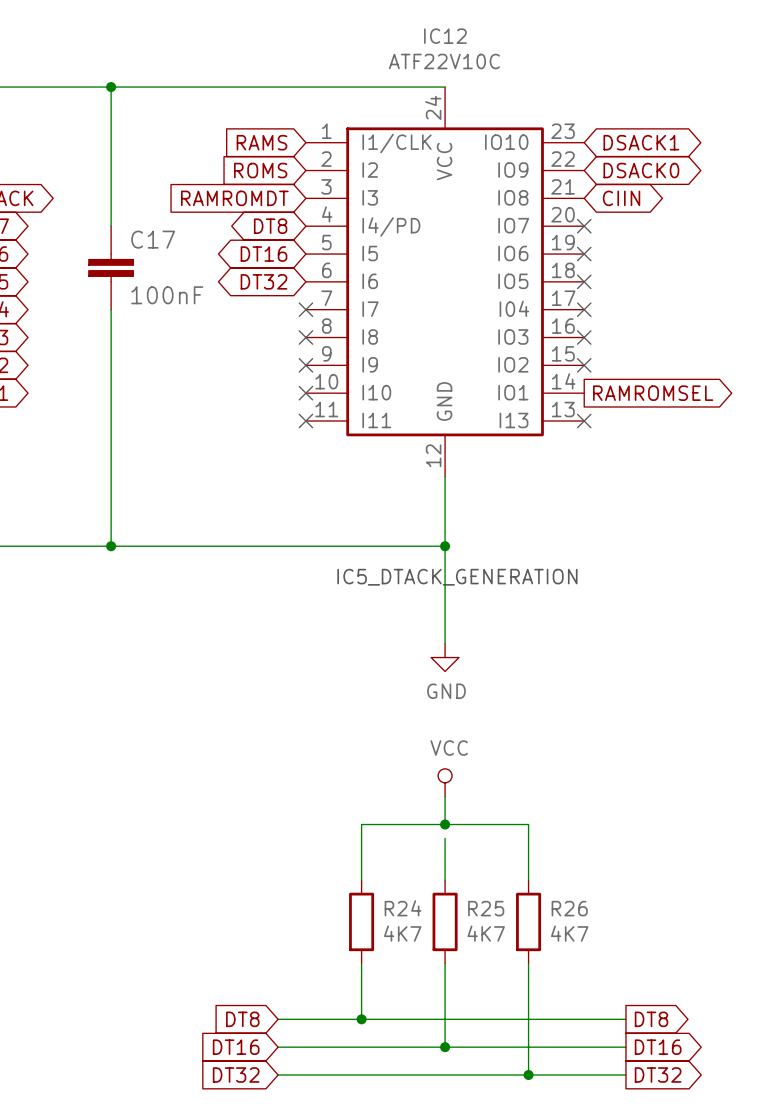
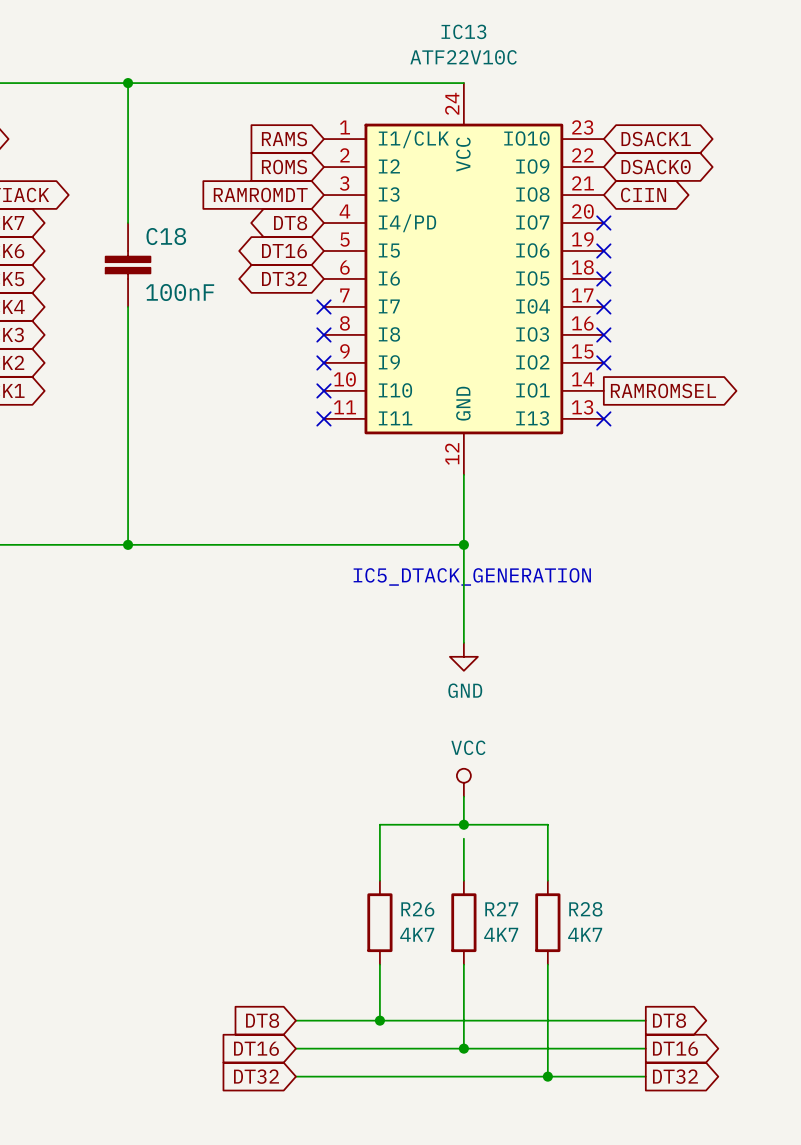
IC12 name: IC12 (445, 36) -> IC13 (463, 31)
C17 name: C17 (153, 239) -> C18 (166, 236)
R24 name: R24 (403, 908) -> R26 (417, 909)
R25 name: R25 (486, 908) -> R27 (501, 909)
R26 name: R26 (569, 908) -> R28 (585, 909)

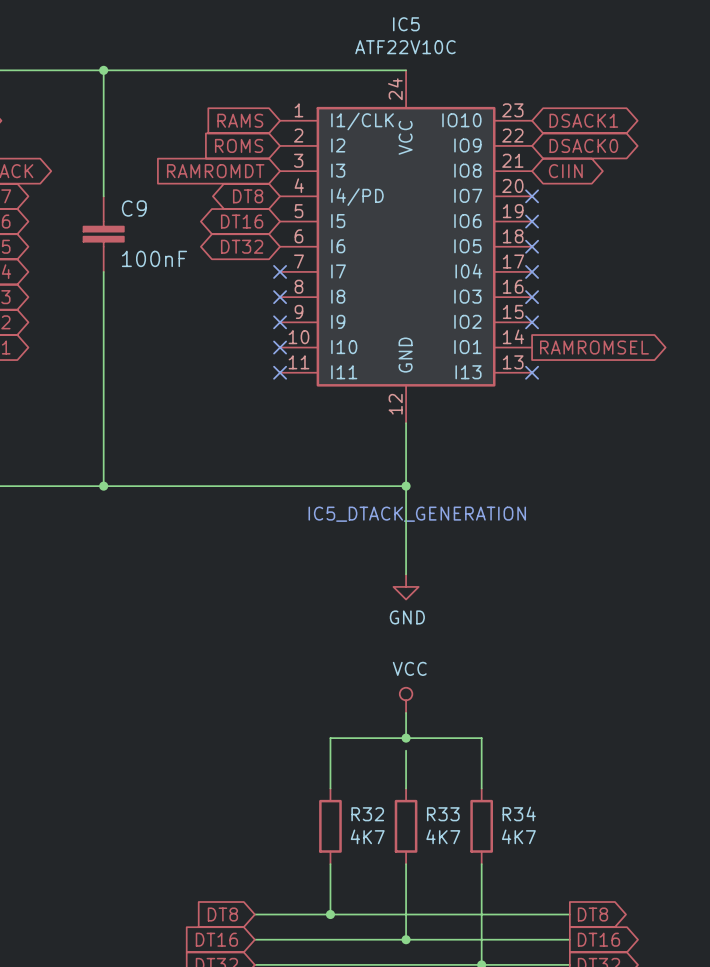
IC13 name: IC13 (463, 31) -> IC5 (406, 24)
C18 name: C18 (166, 236) -> C9 (134, 208)
R26 name: R26 (417, 909) -> R32 (367, 814)
R27 name: R27 (501, 909) -> R33 (443, 814)
R28 name: R28 (585, 909) -> R34 (519, 813)

